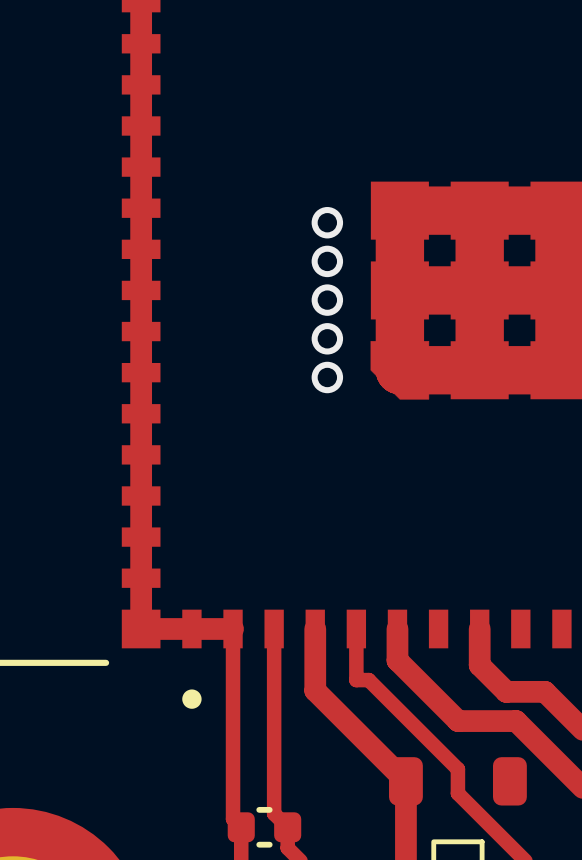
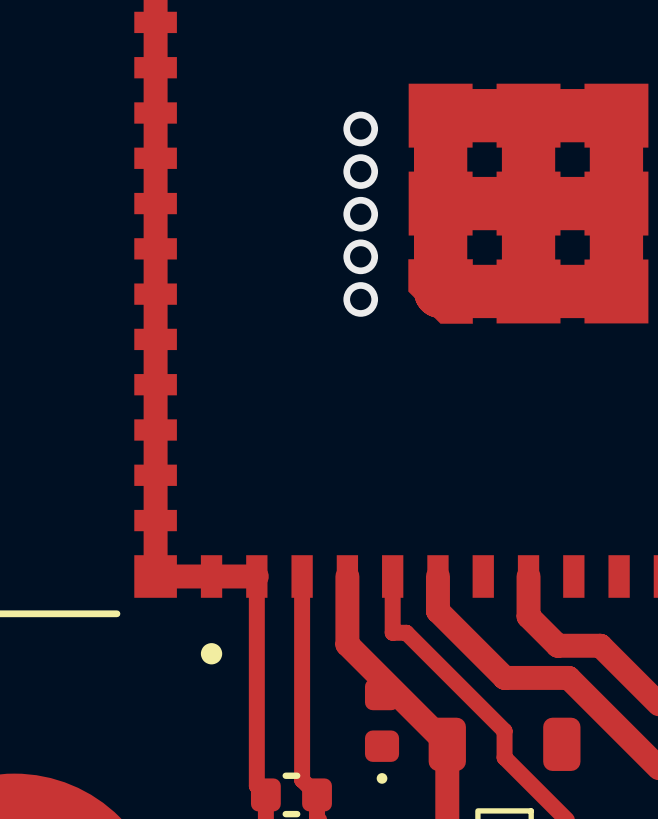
part: none -> (382, 731)

